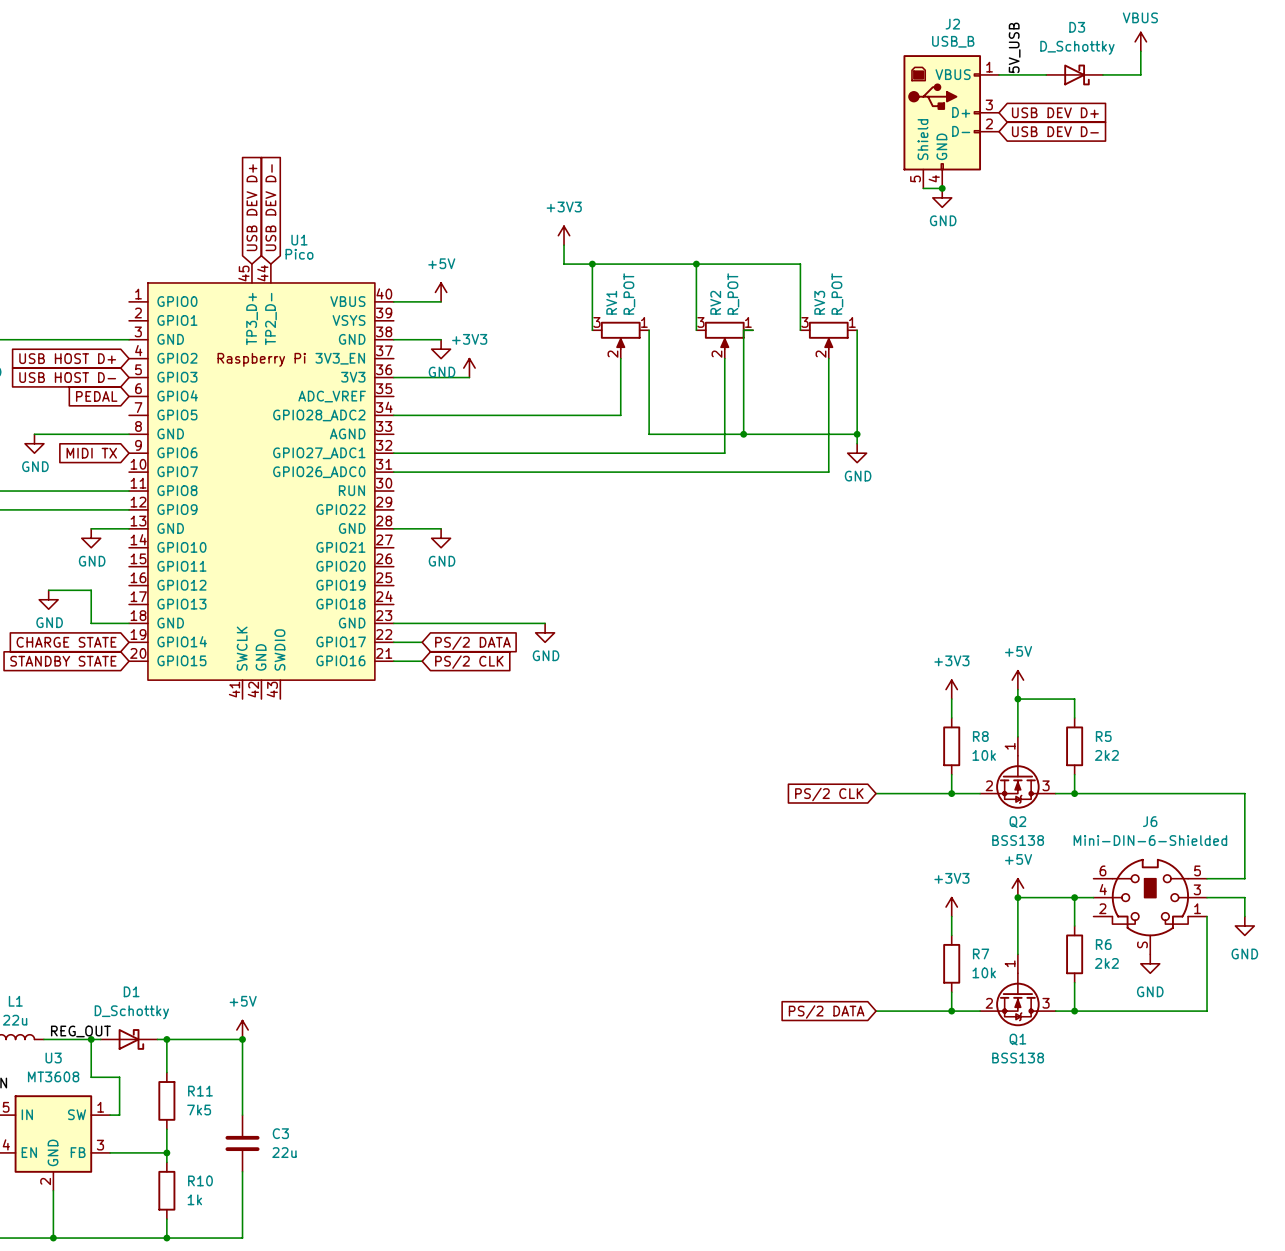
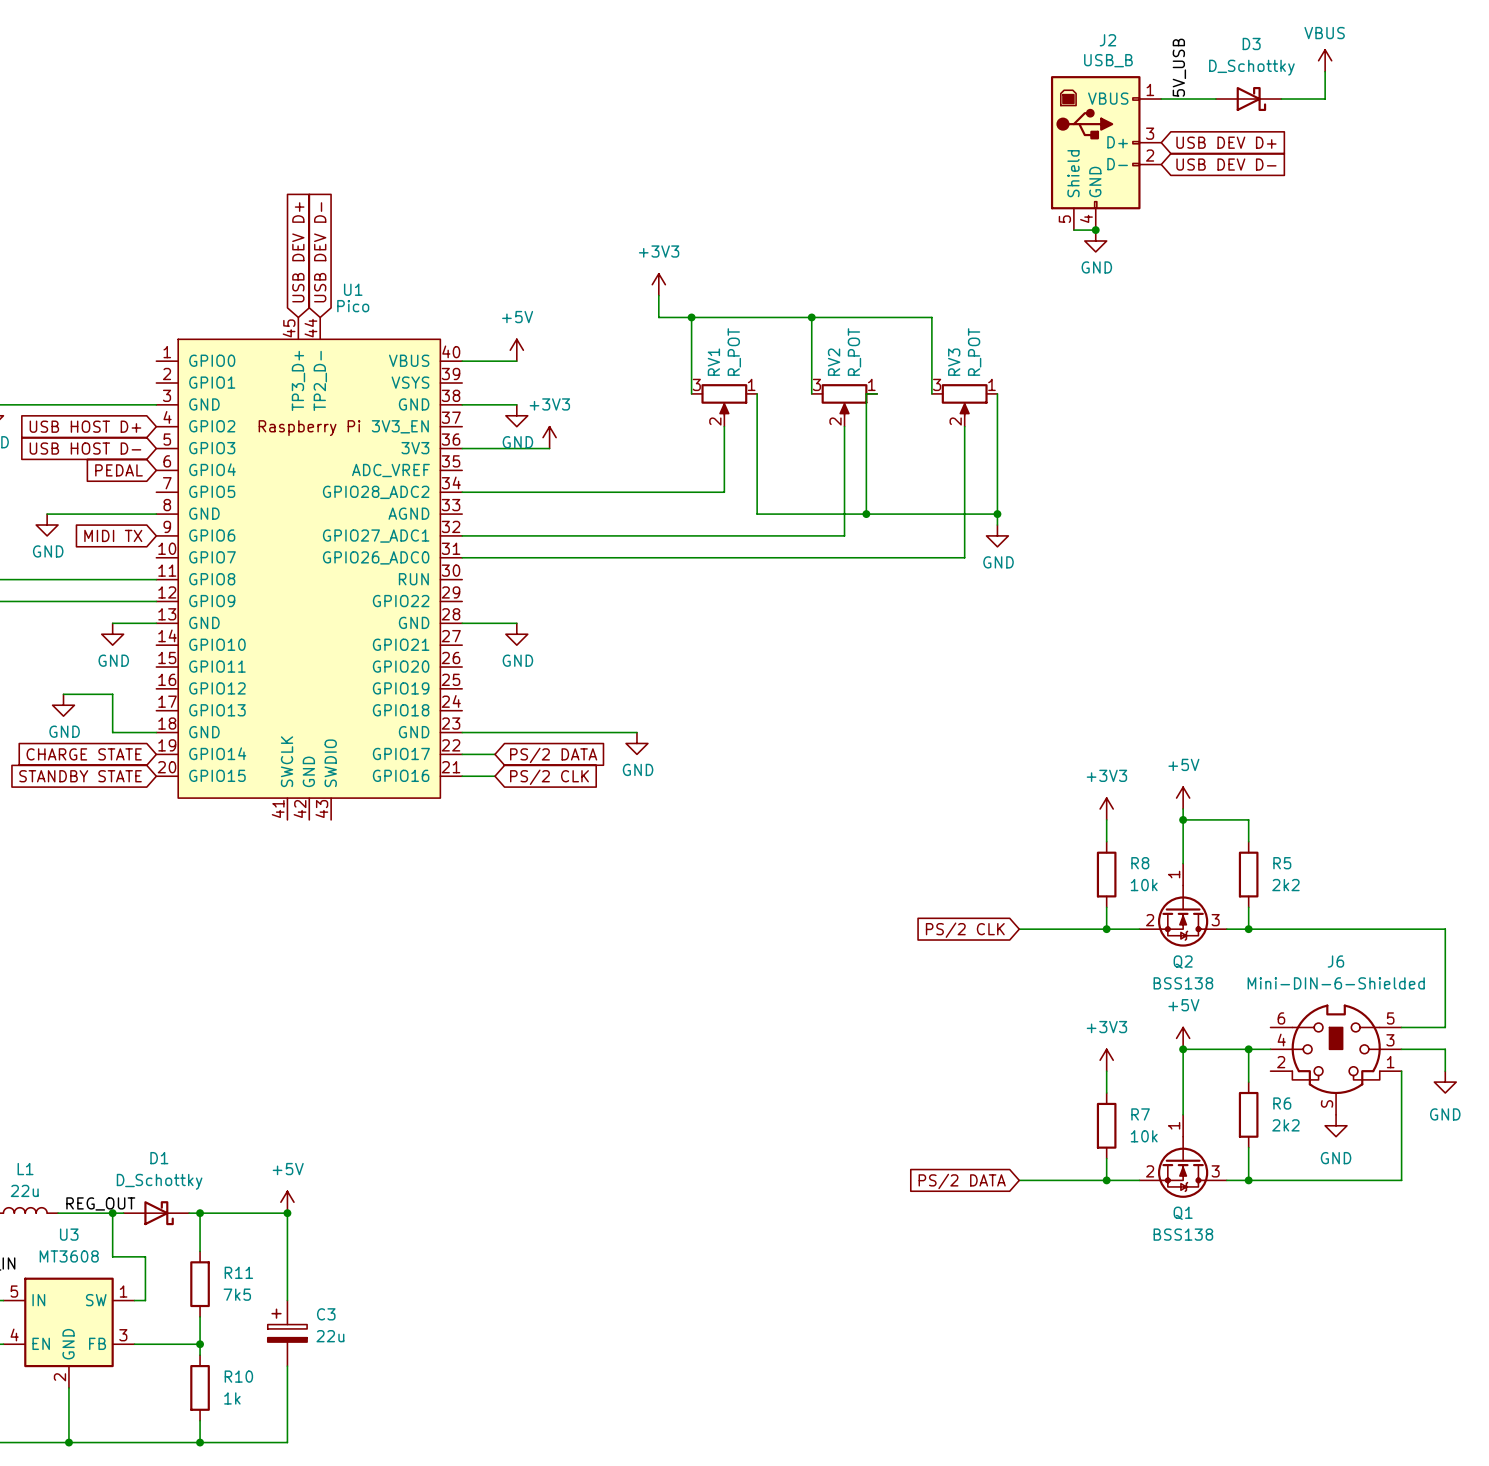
C3 symbol: [225, 1115, 260, 1172] -> [267, 1300, 308, 1367]

